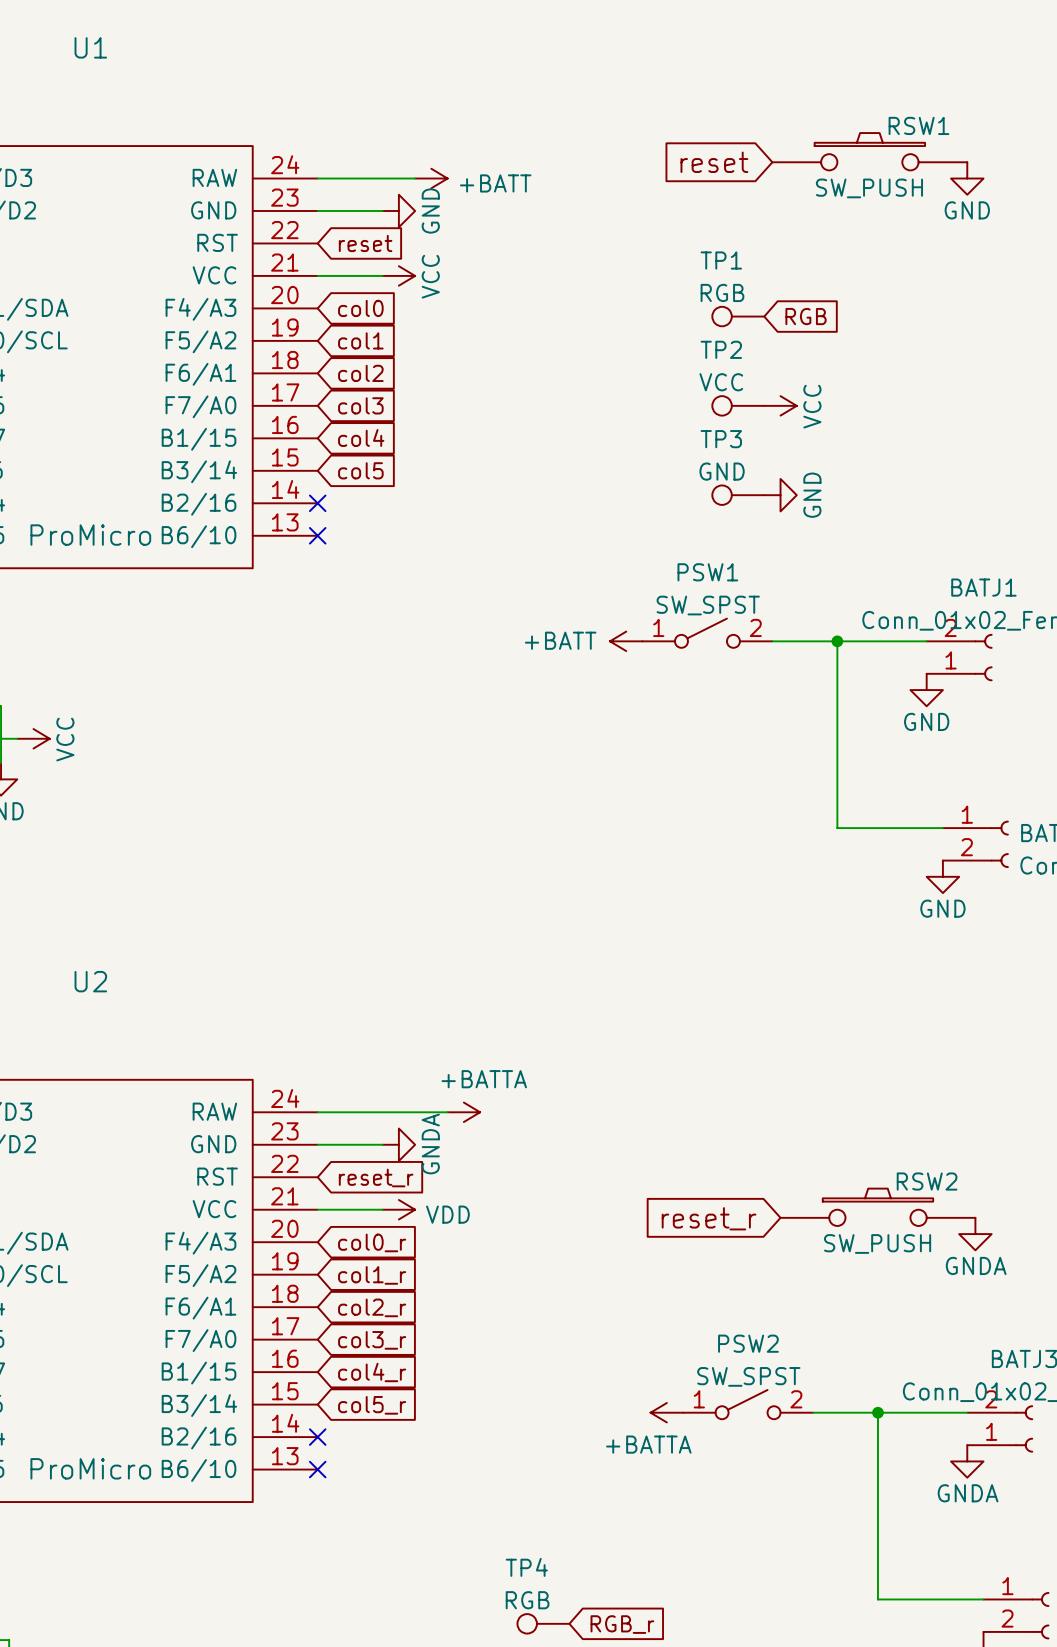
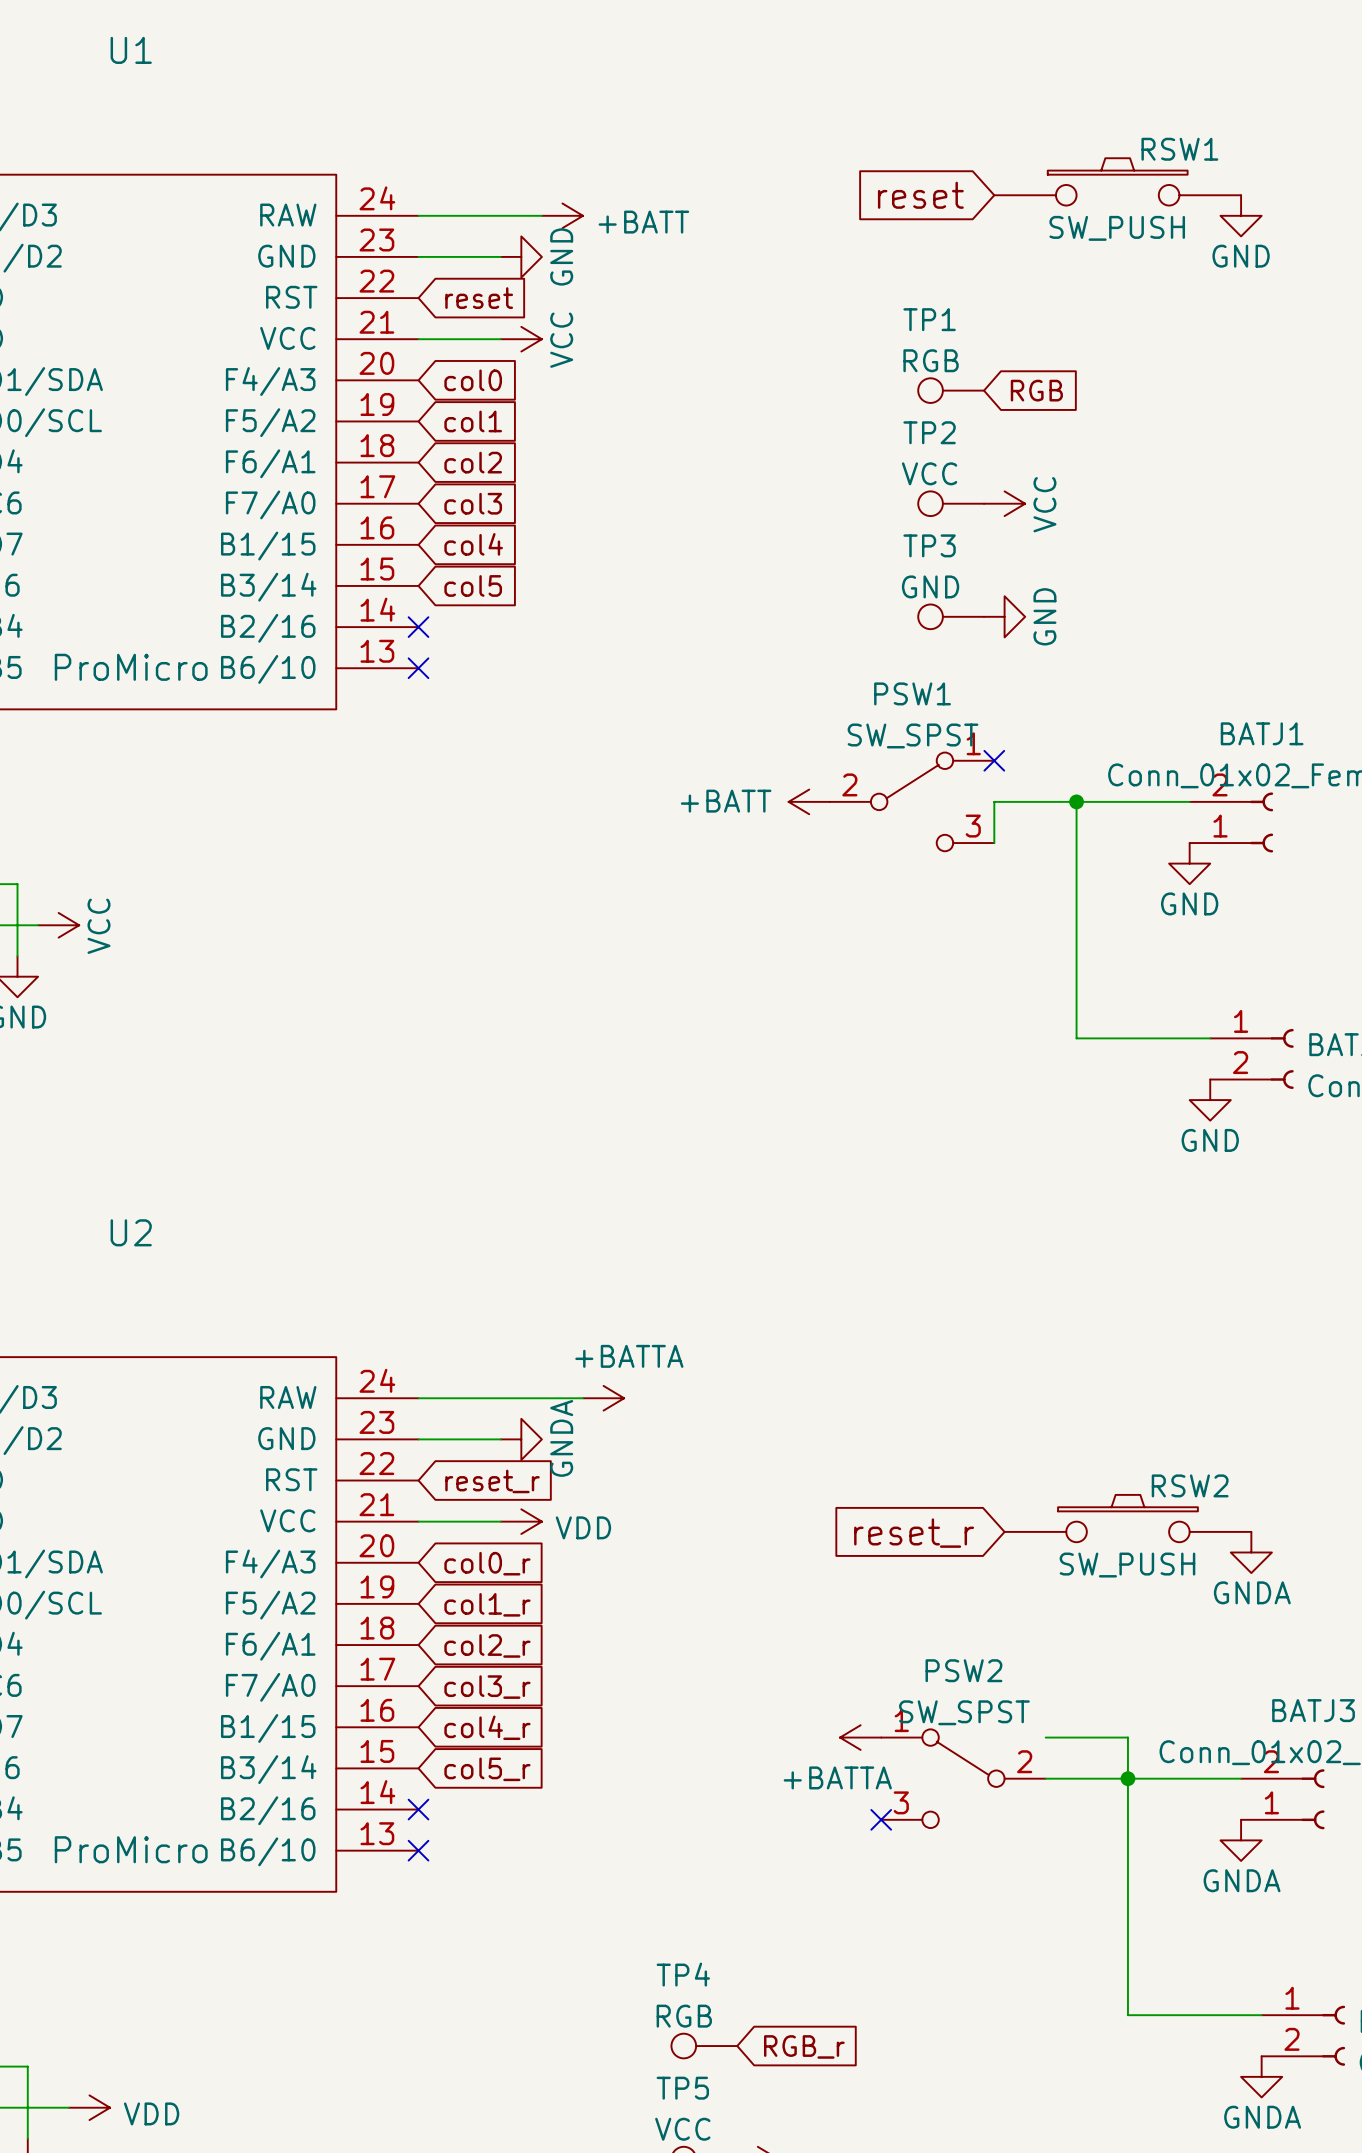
no-connect mark: none -> (994, 760)
PSW1 symbol: [642, 618, 773, 648] -> [829, 752, 995, 852]
wire: none -> (994, 801) (994, 843)
wire: none -> (1045, 1737) (1127, 1737) (1127, 1778)
PSW2 symbol: [683, 1389, 814, 1420] -> [881, 1729, 1046, 1829]
power symbol position: +BATTA (666, 1412) -> +BATTA (860, 1737)
no-connect mark: none -> (881, 1819)

